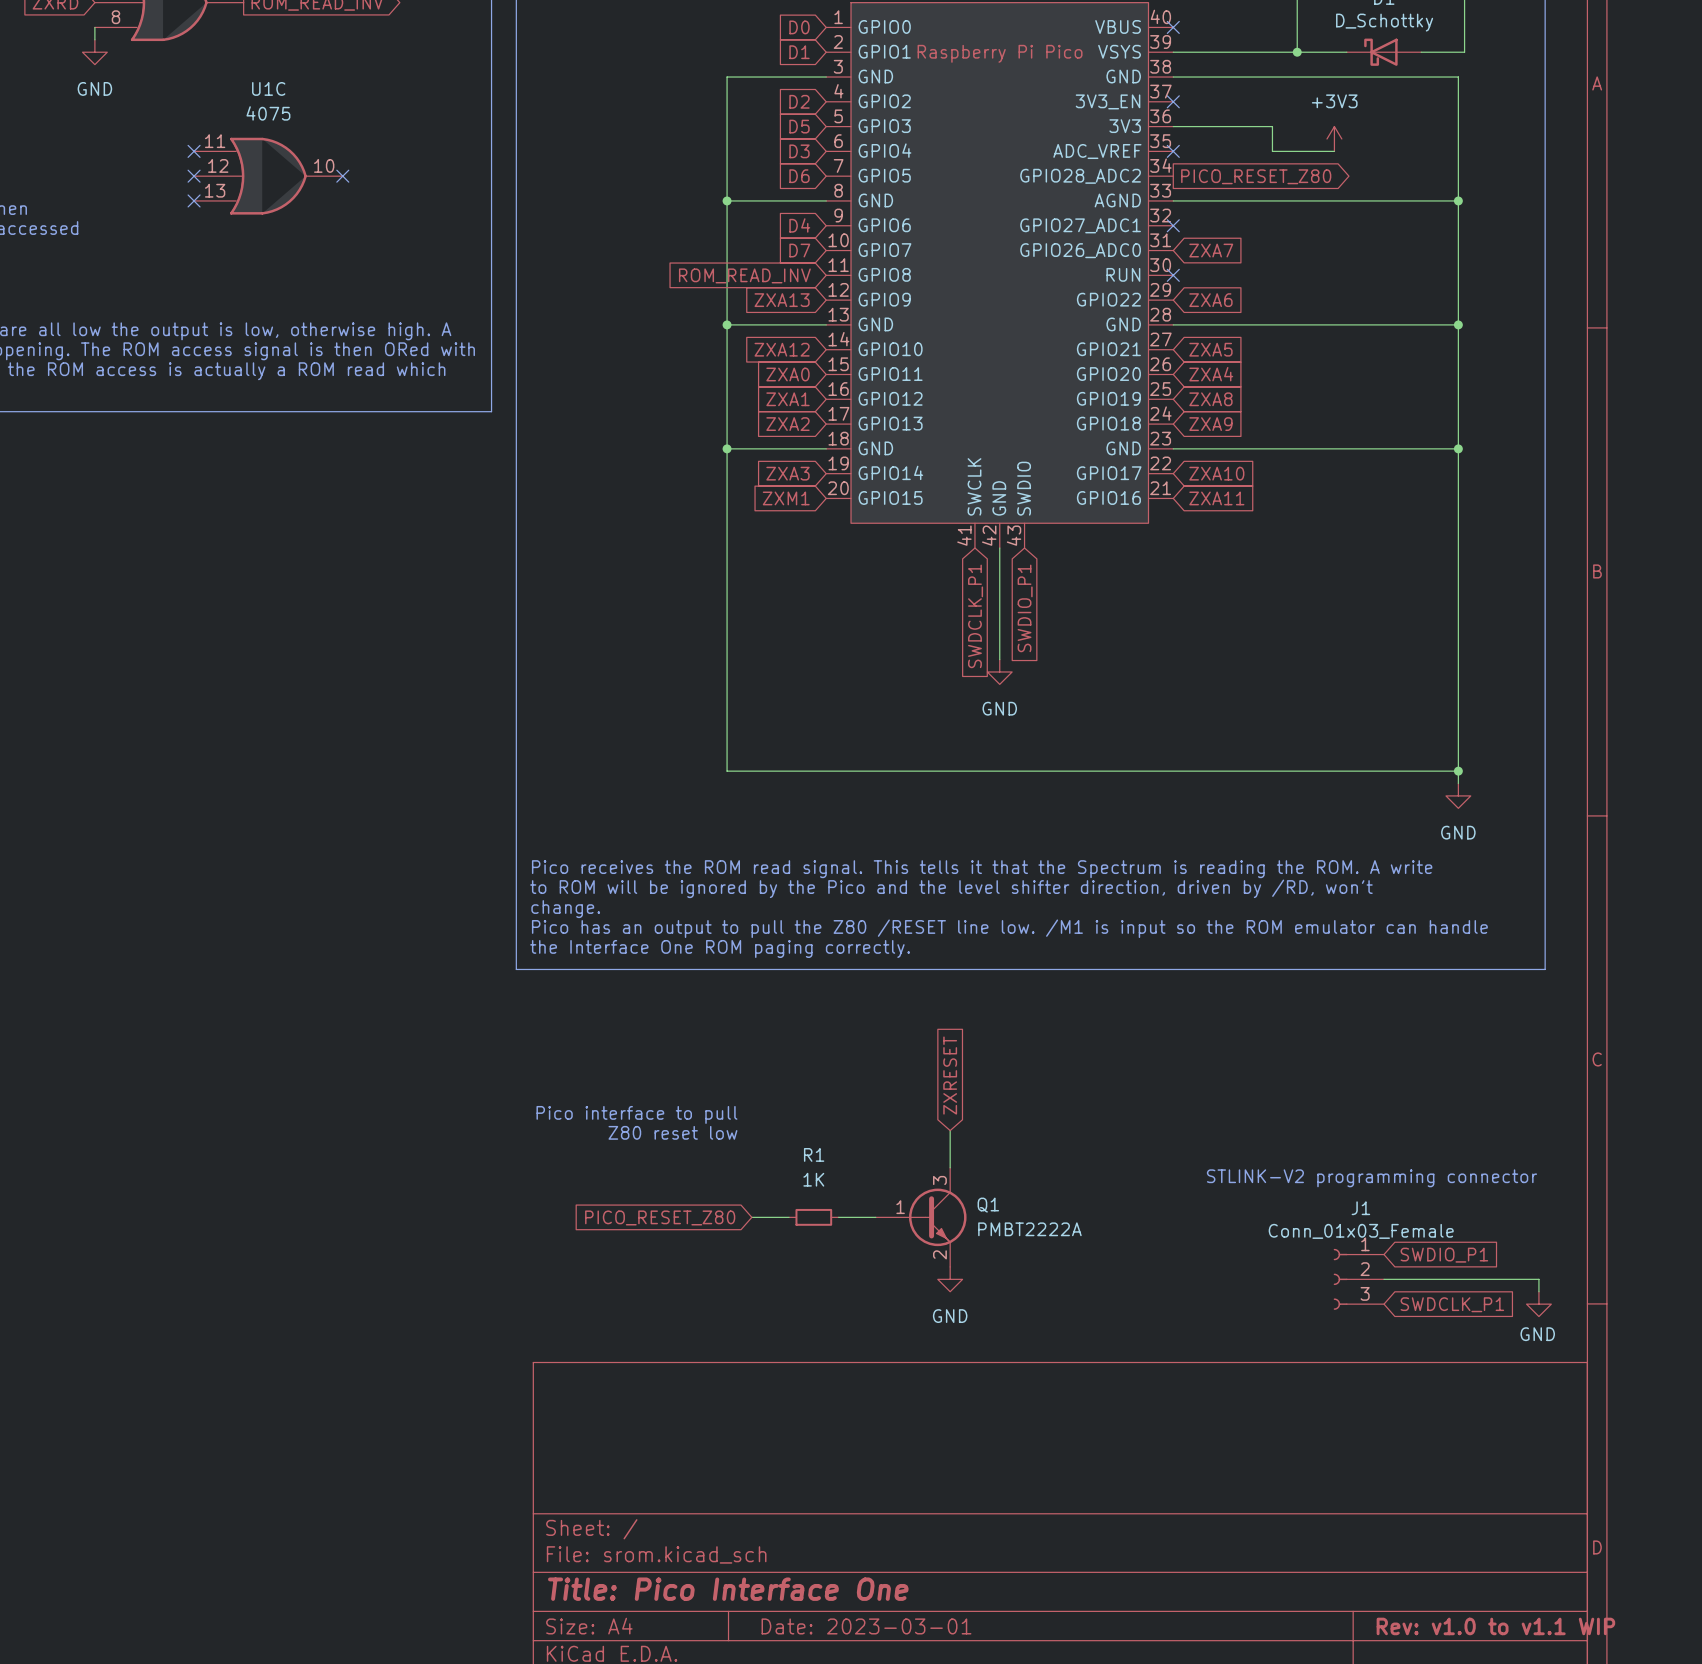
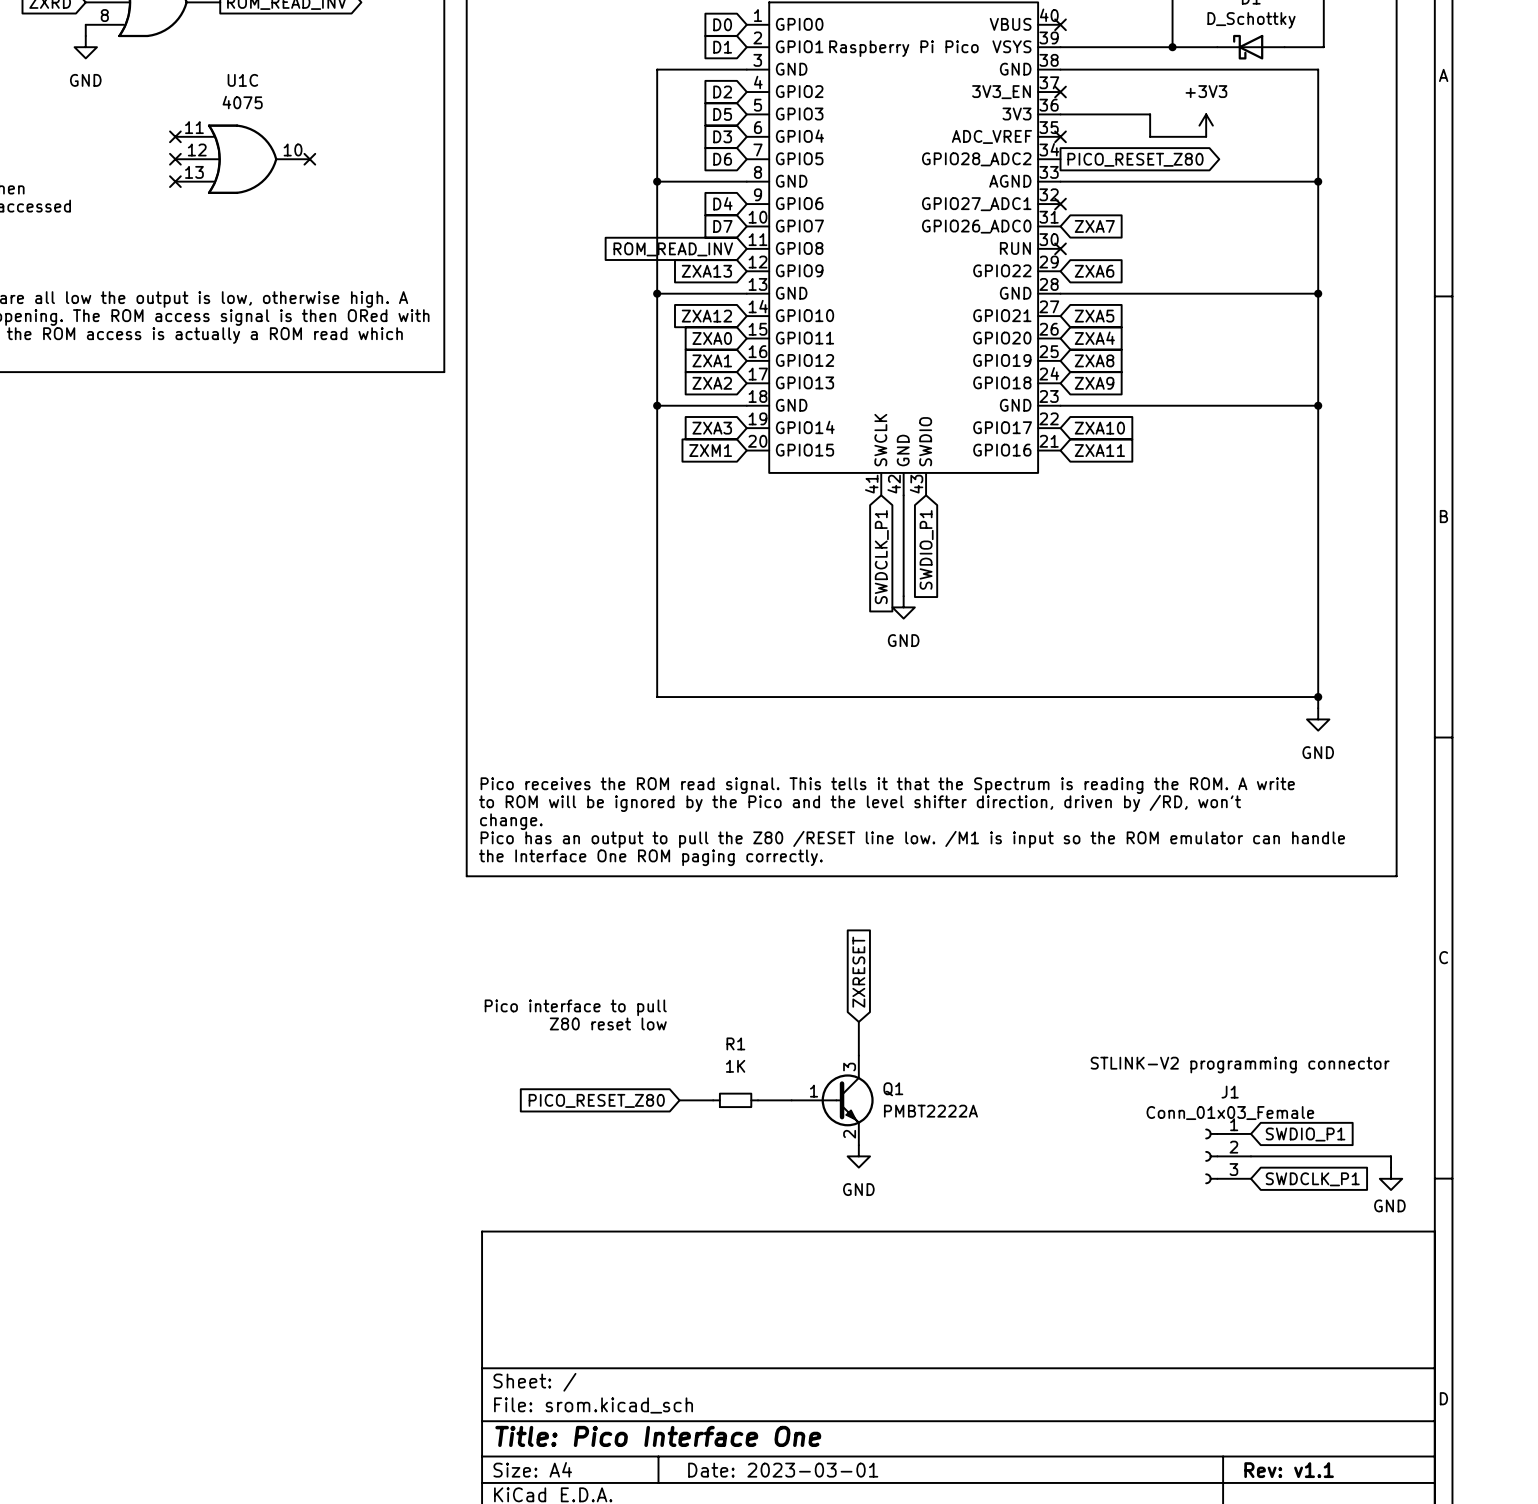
title block: Rev: v1.0 to v1.1 WIP (1495, 1626) -> Rev: v1.1 (1289, 1470)

